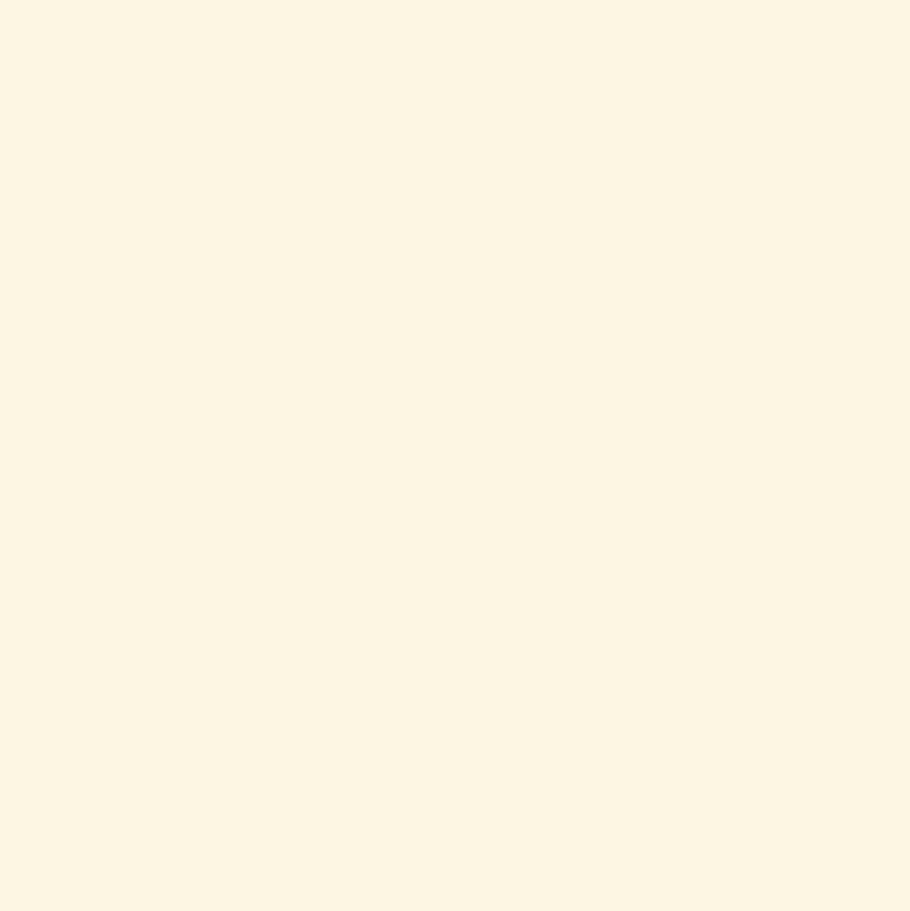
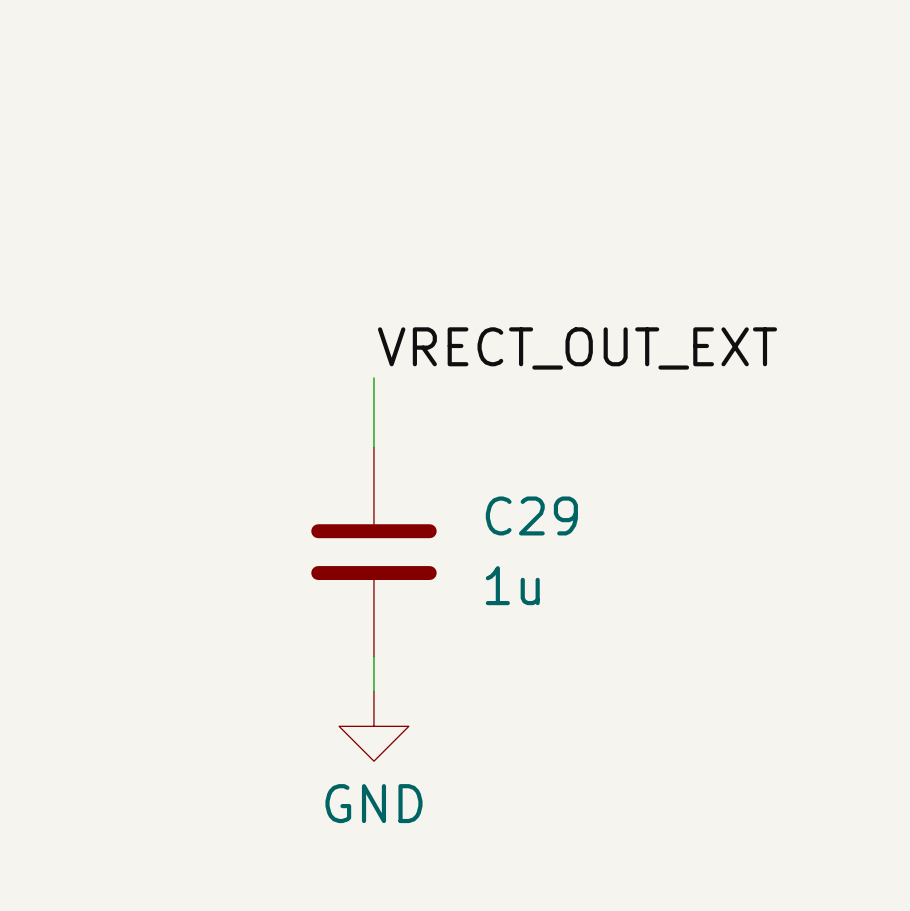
label: none -> VRECT_OUT_EXT (577, 348)
wire: none -> (373, 377) (373, 447)
C29: none -> (373, 552)
wire: none -> (373, 656) (373, 691)
power symbol: none -> GND (373, 726)

